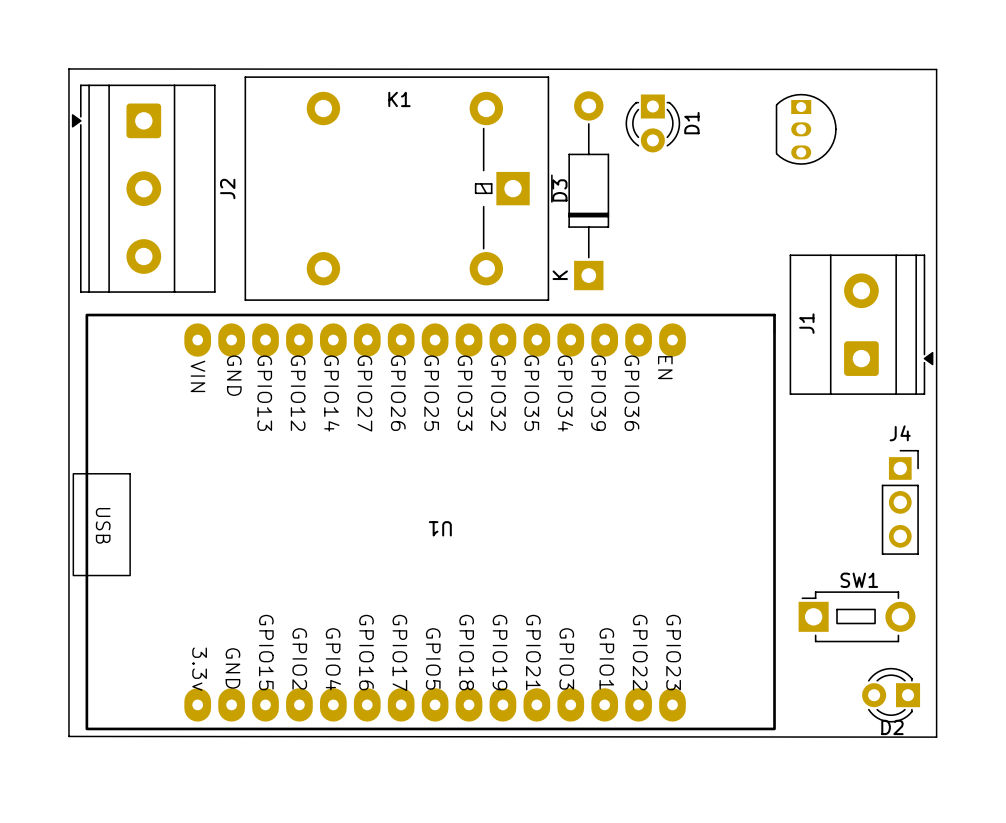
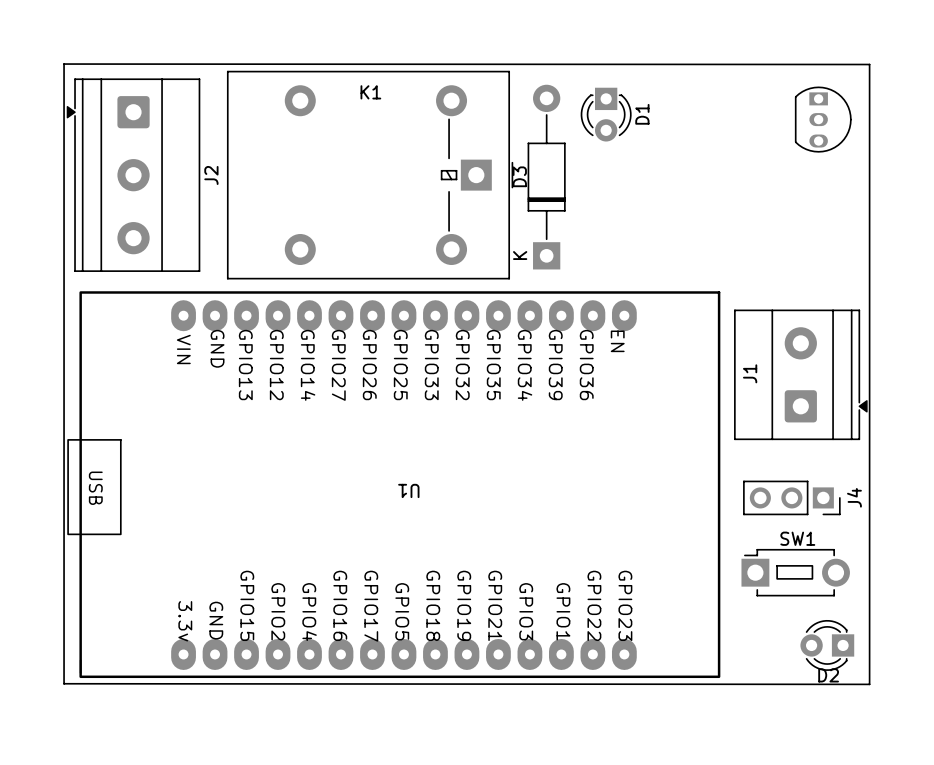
part position: (806, 129) -> (823, 119)
J1 position: (861, 324) -> (800, 374)
J4 rotation: 0° (900, 502) -> 90° clockwise (791, 497)

